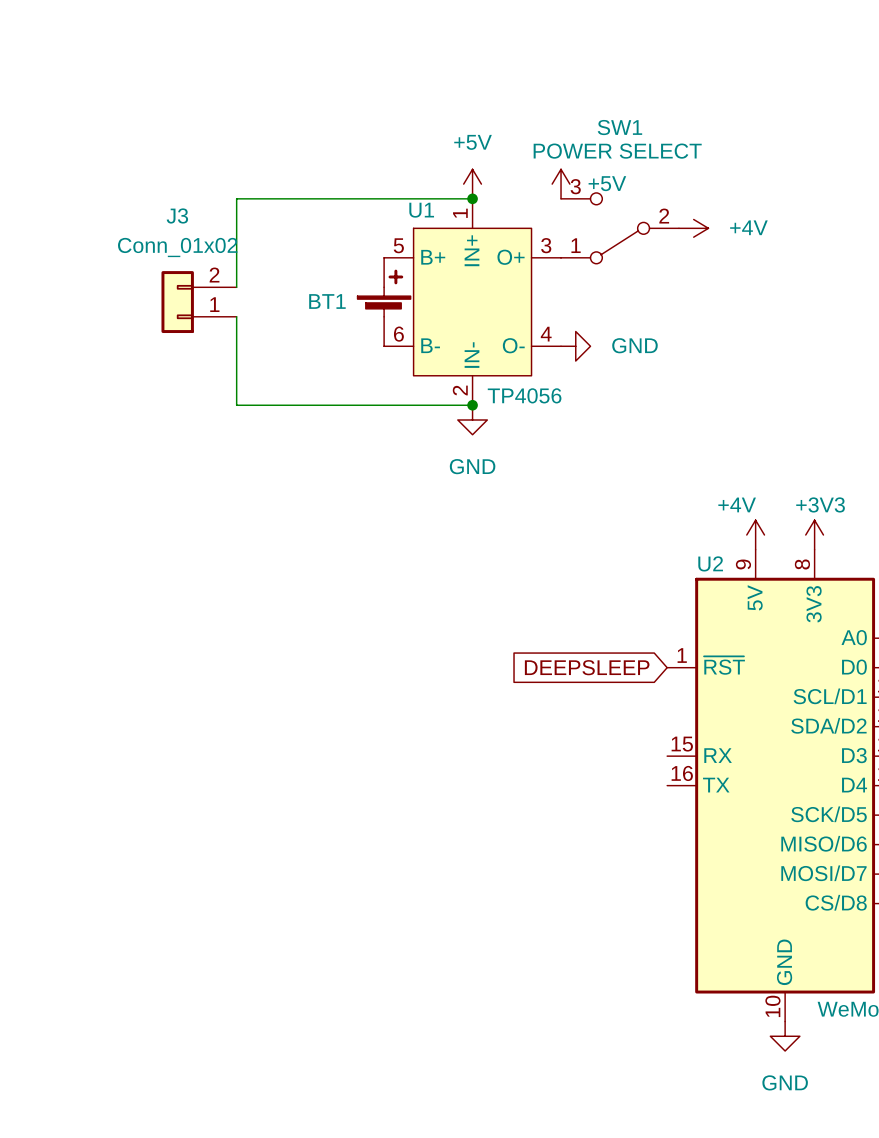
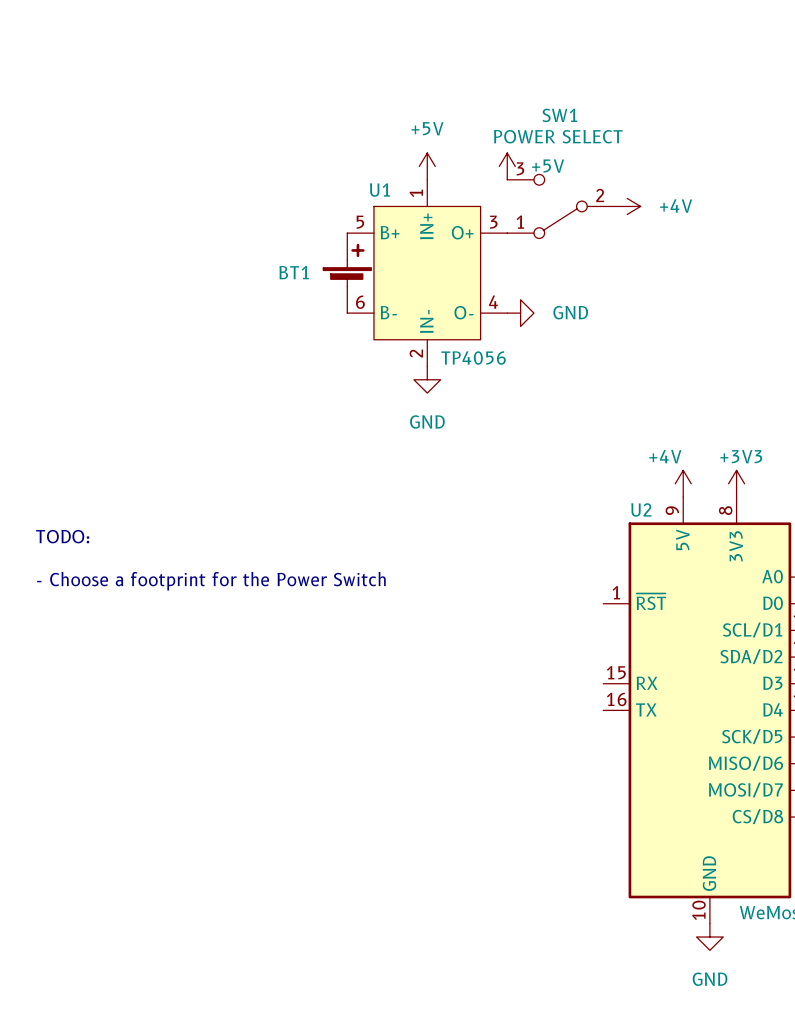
wire: (472, 198) (236, 198) (236, 287) -> none
junction: (472, 198) -> none
J3: Conn_01x02 (199, 302) -> none
wire: (236, 316) (236, 405) (472, 405) -> none
junction: (472, 405) -> none
text: none -> TODO: (62, 536)
text: none -> - Choose a footprint for the Power Switch (211, 581)
global label: DEEPSLEEP (587, 667) -> none

